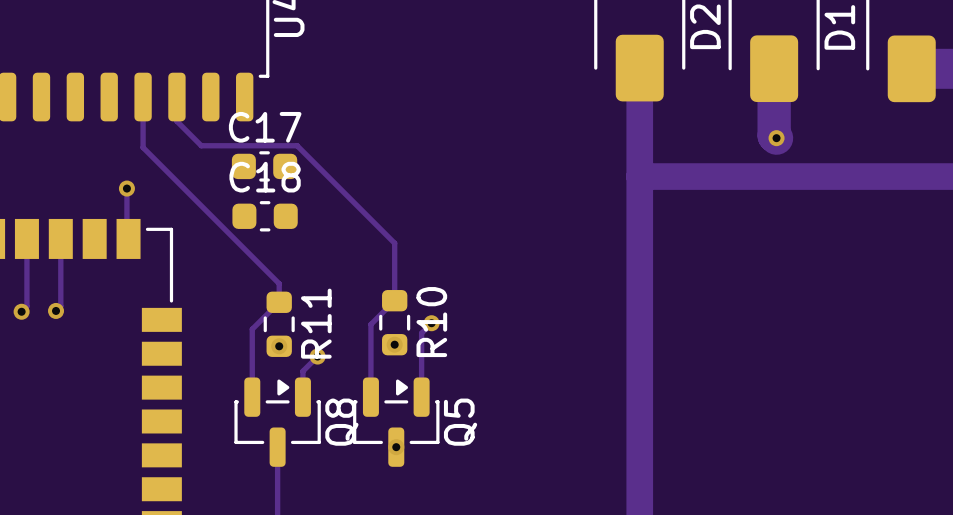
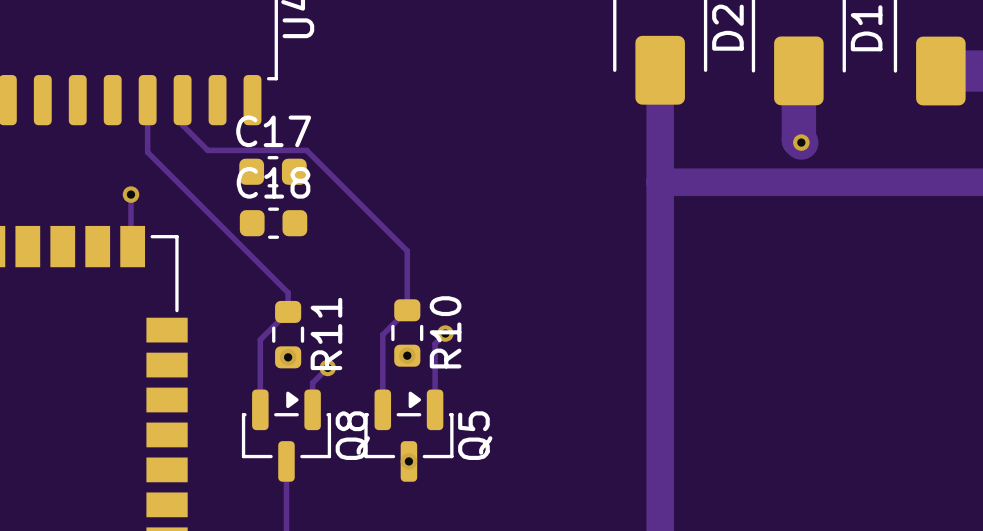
track: (26, 238) (26, 306) (21, 311) -> none
track: (60, 238) (60, 306) (56, 310) -> none
via: (56, 310) -> none
via: (21, 311) -> none

